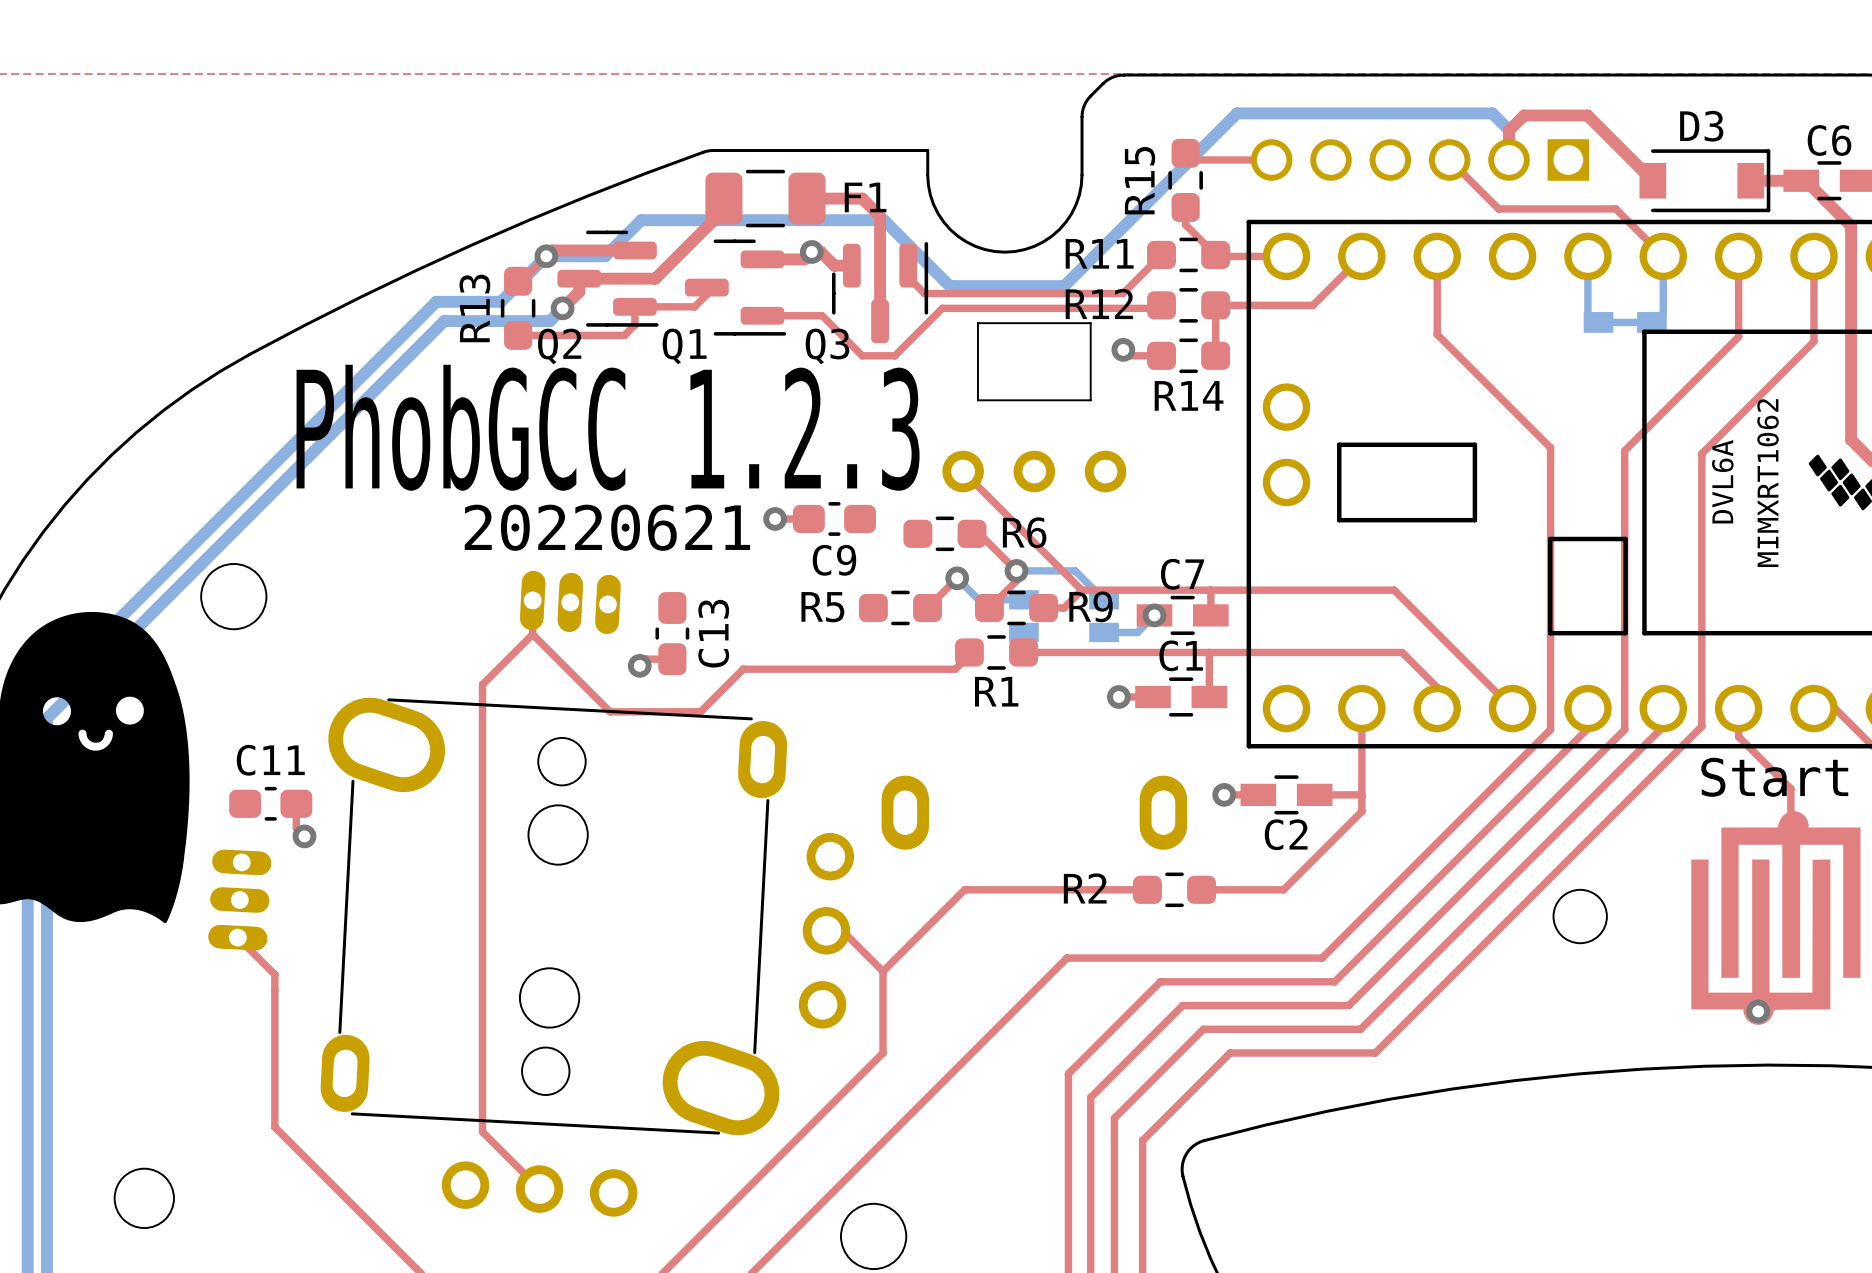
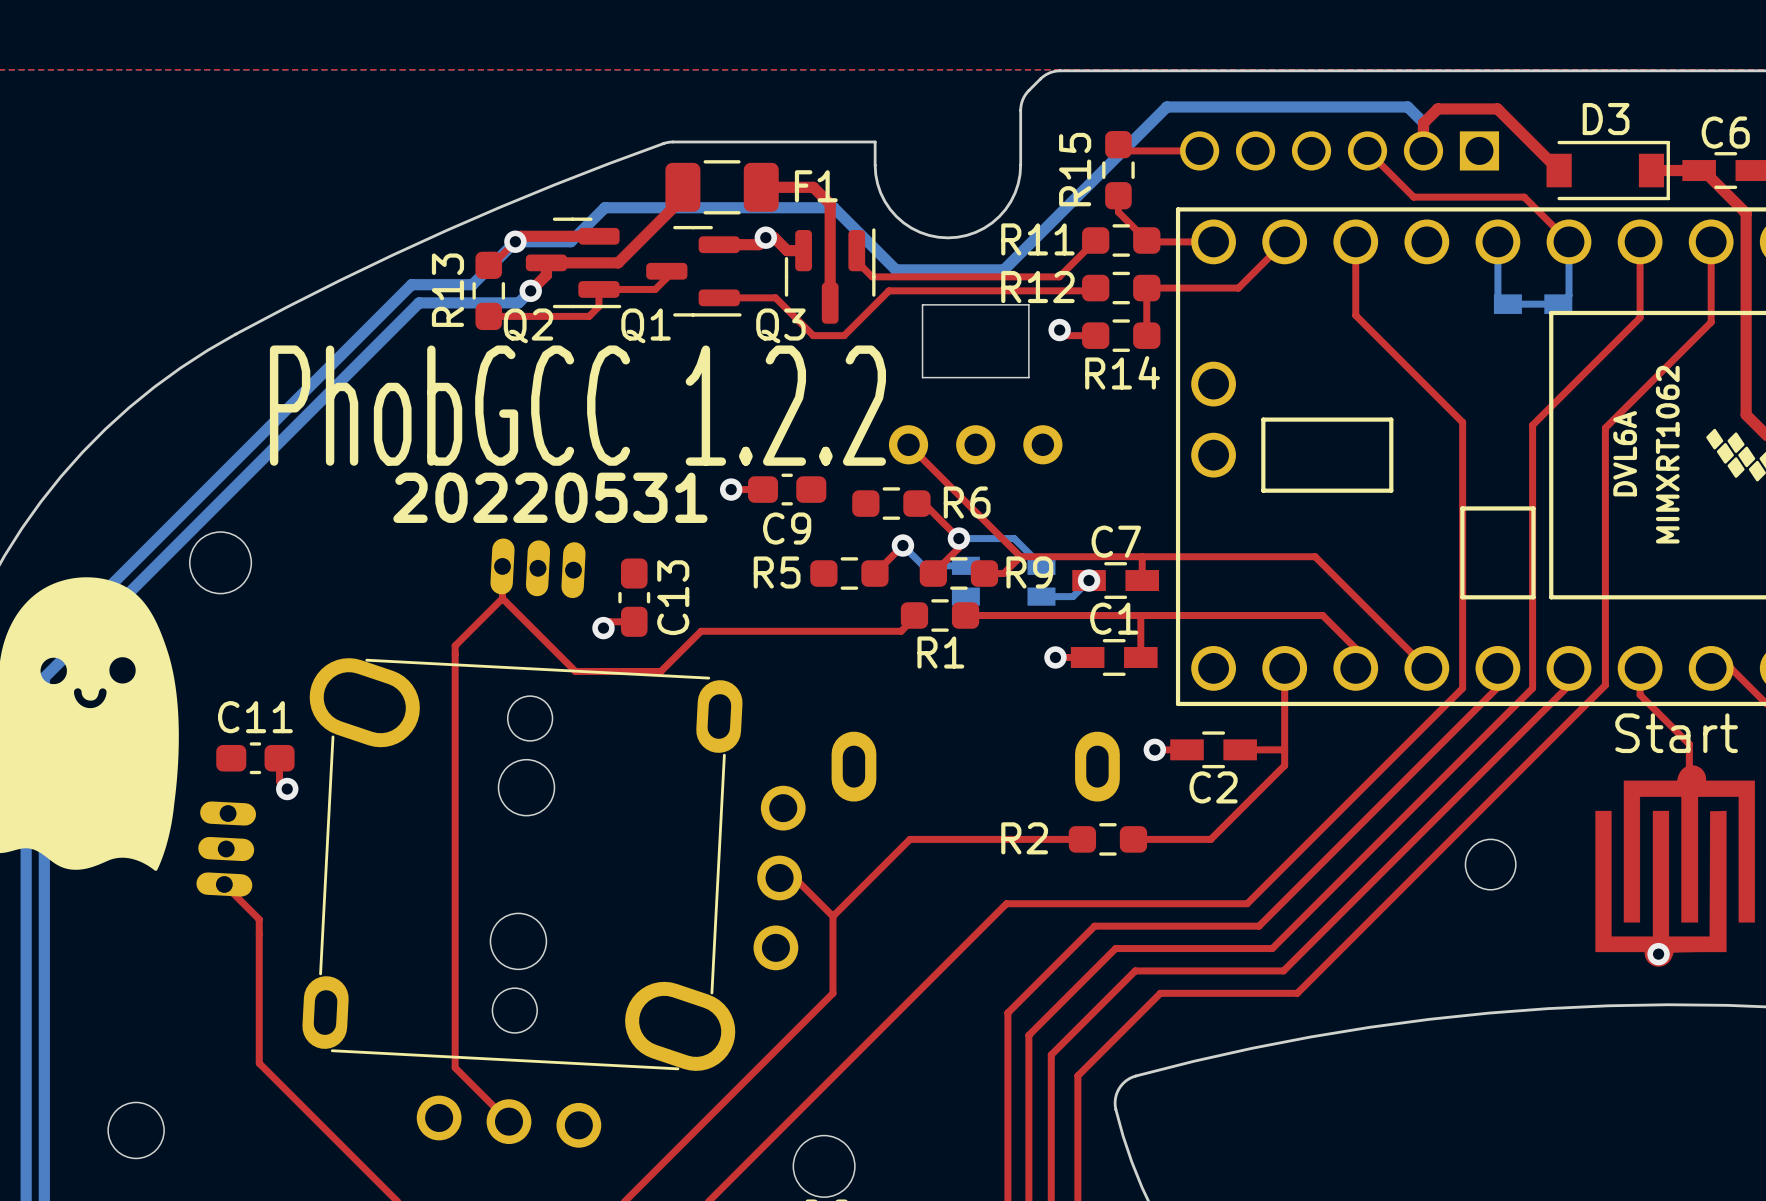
text: PhobGCC 1.2.3 (608, 427) -> PhobGCC 1.2.2 (577, 405)
text: 20220621 (607, 527) -> 20220531 (550, 497)

